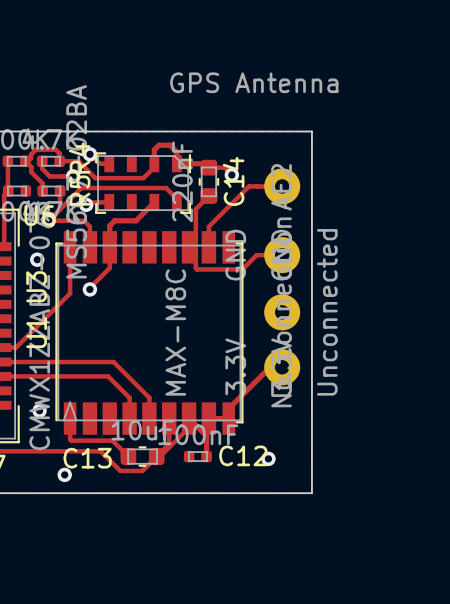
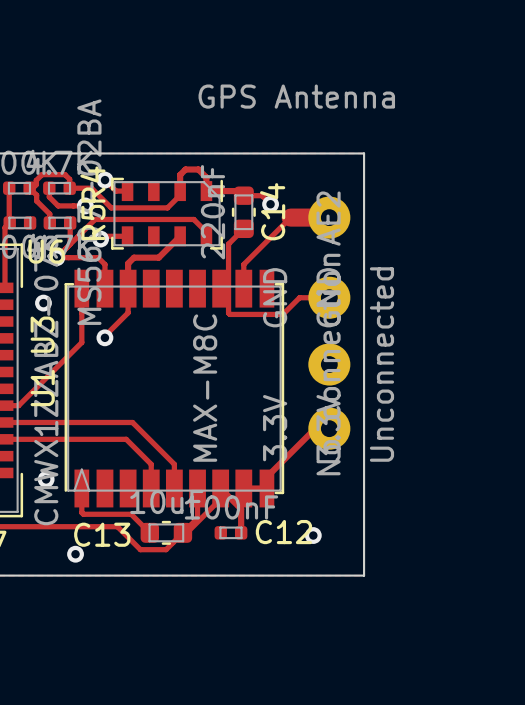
track width: thin (249, 186) (282, 186) -> thick (290, 217) (329, 217)

